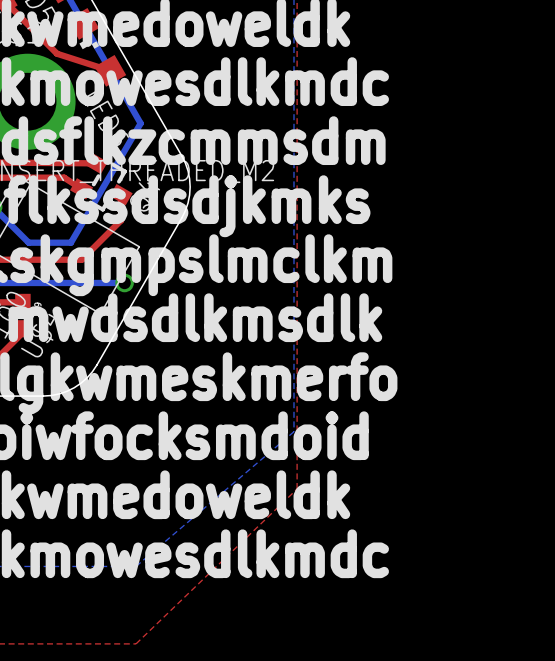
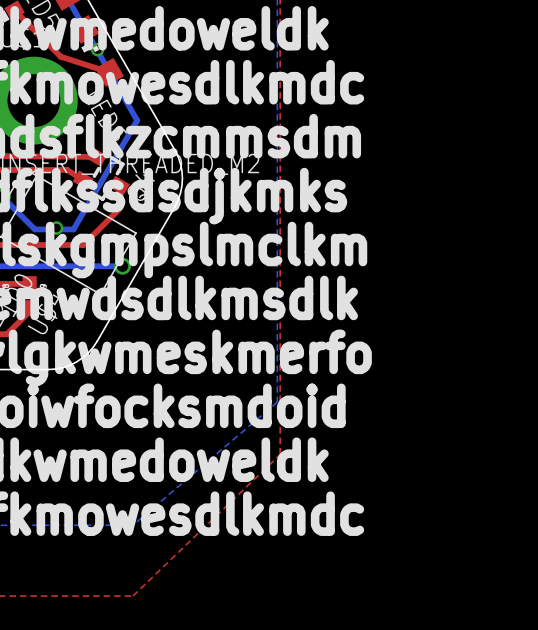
via: none -> (97, 49)
via: none -> (56, 228)

